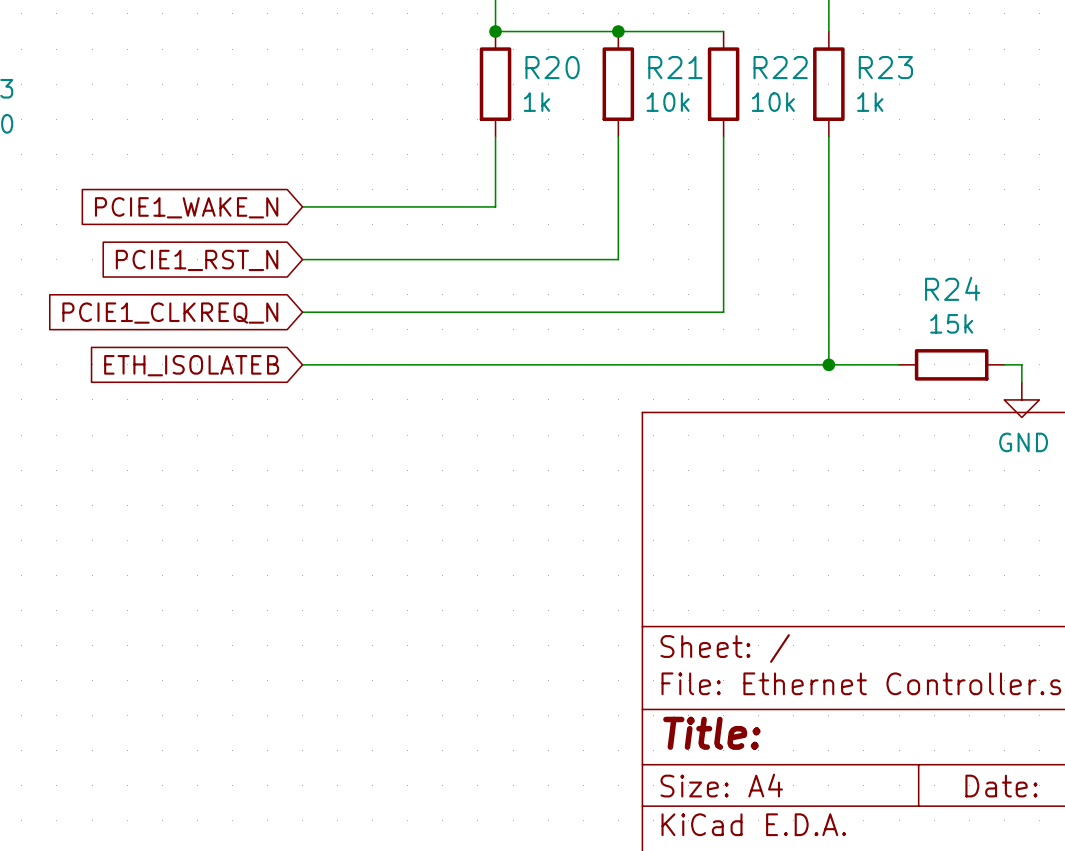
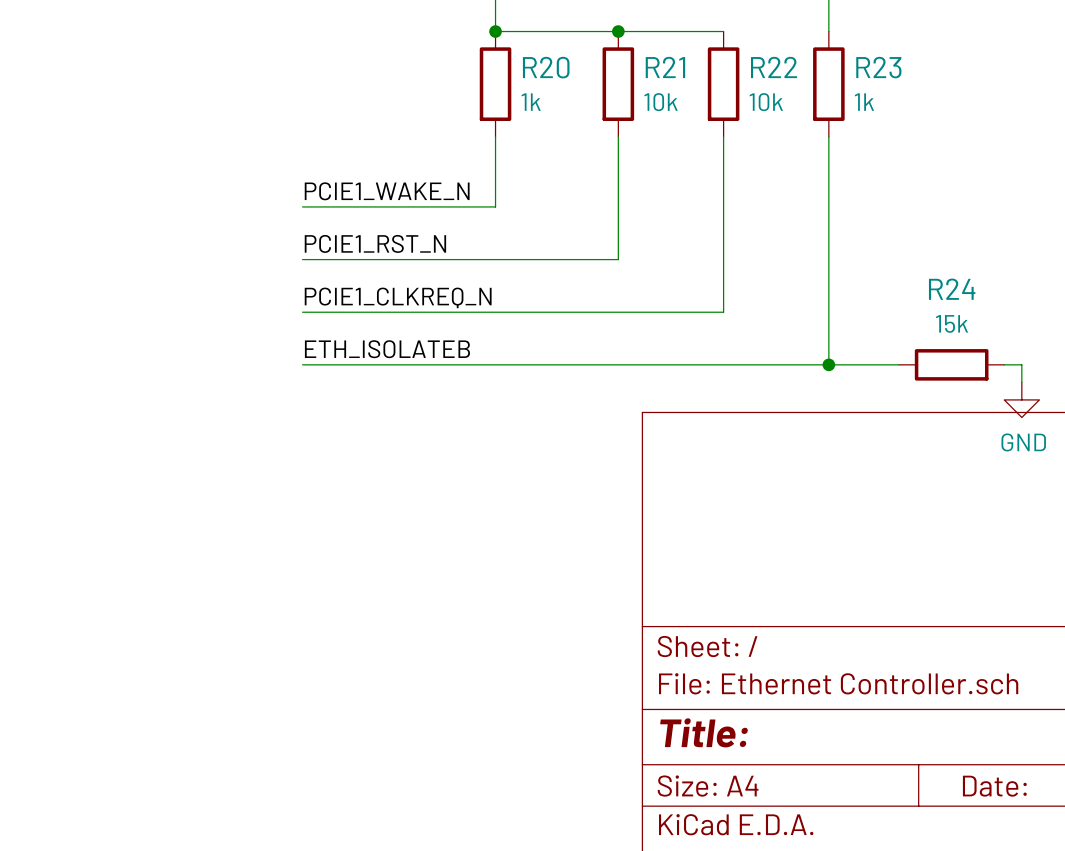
label: none -> PCIE1_WAKE_N (387, 191)
global label: PCIE1_WAKE_N (186, 207) -> none
label: none -> PCIE1_RST_N (375, 243)
global label: PCIE1_RST_N (197, 260) -> none
label: none -> PCIE1_CLKREQ_N (398, 297)
global label: PCIE1_CLKREQ_N (170, 313) -> none
label: none -> ETH_ISOLATEB (387, 349)
global label: ETH_ISOLATEB (191, 365) -> none

